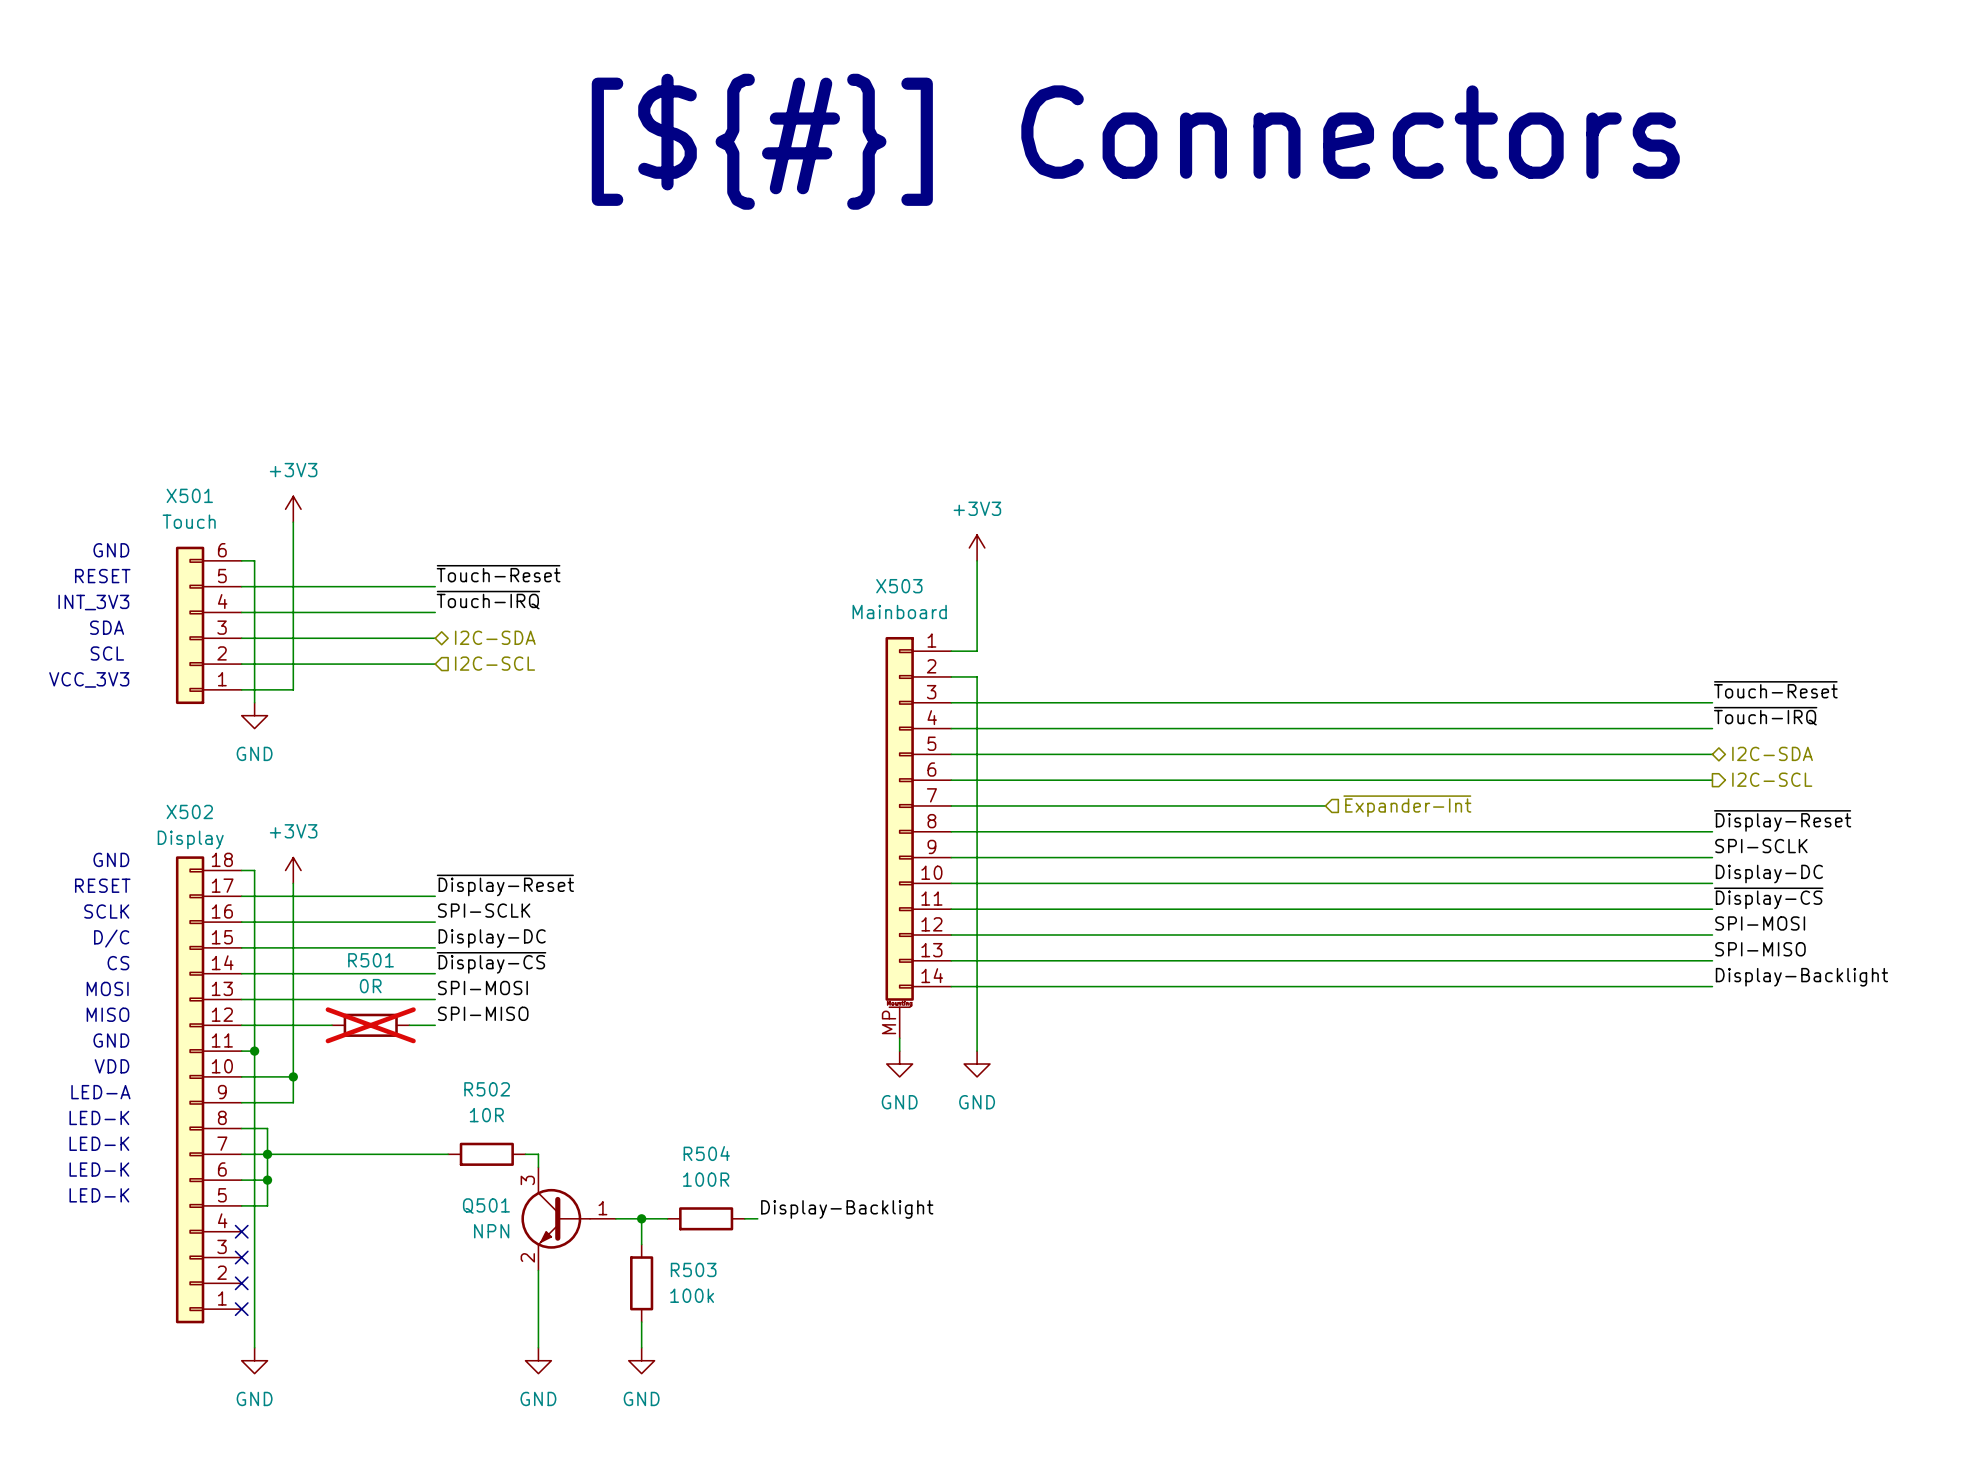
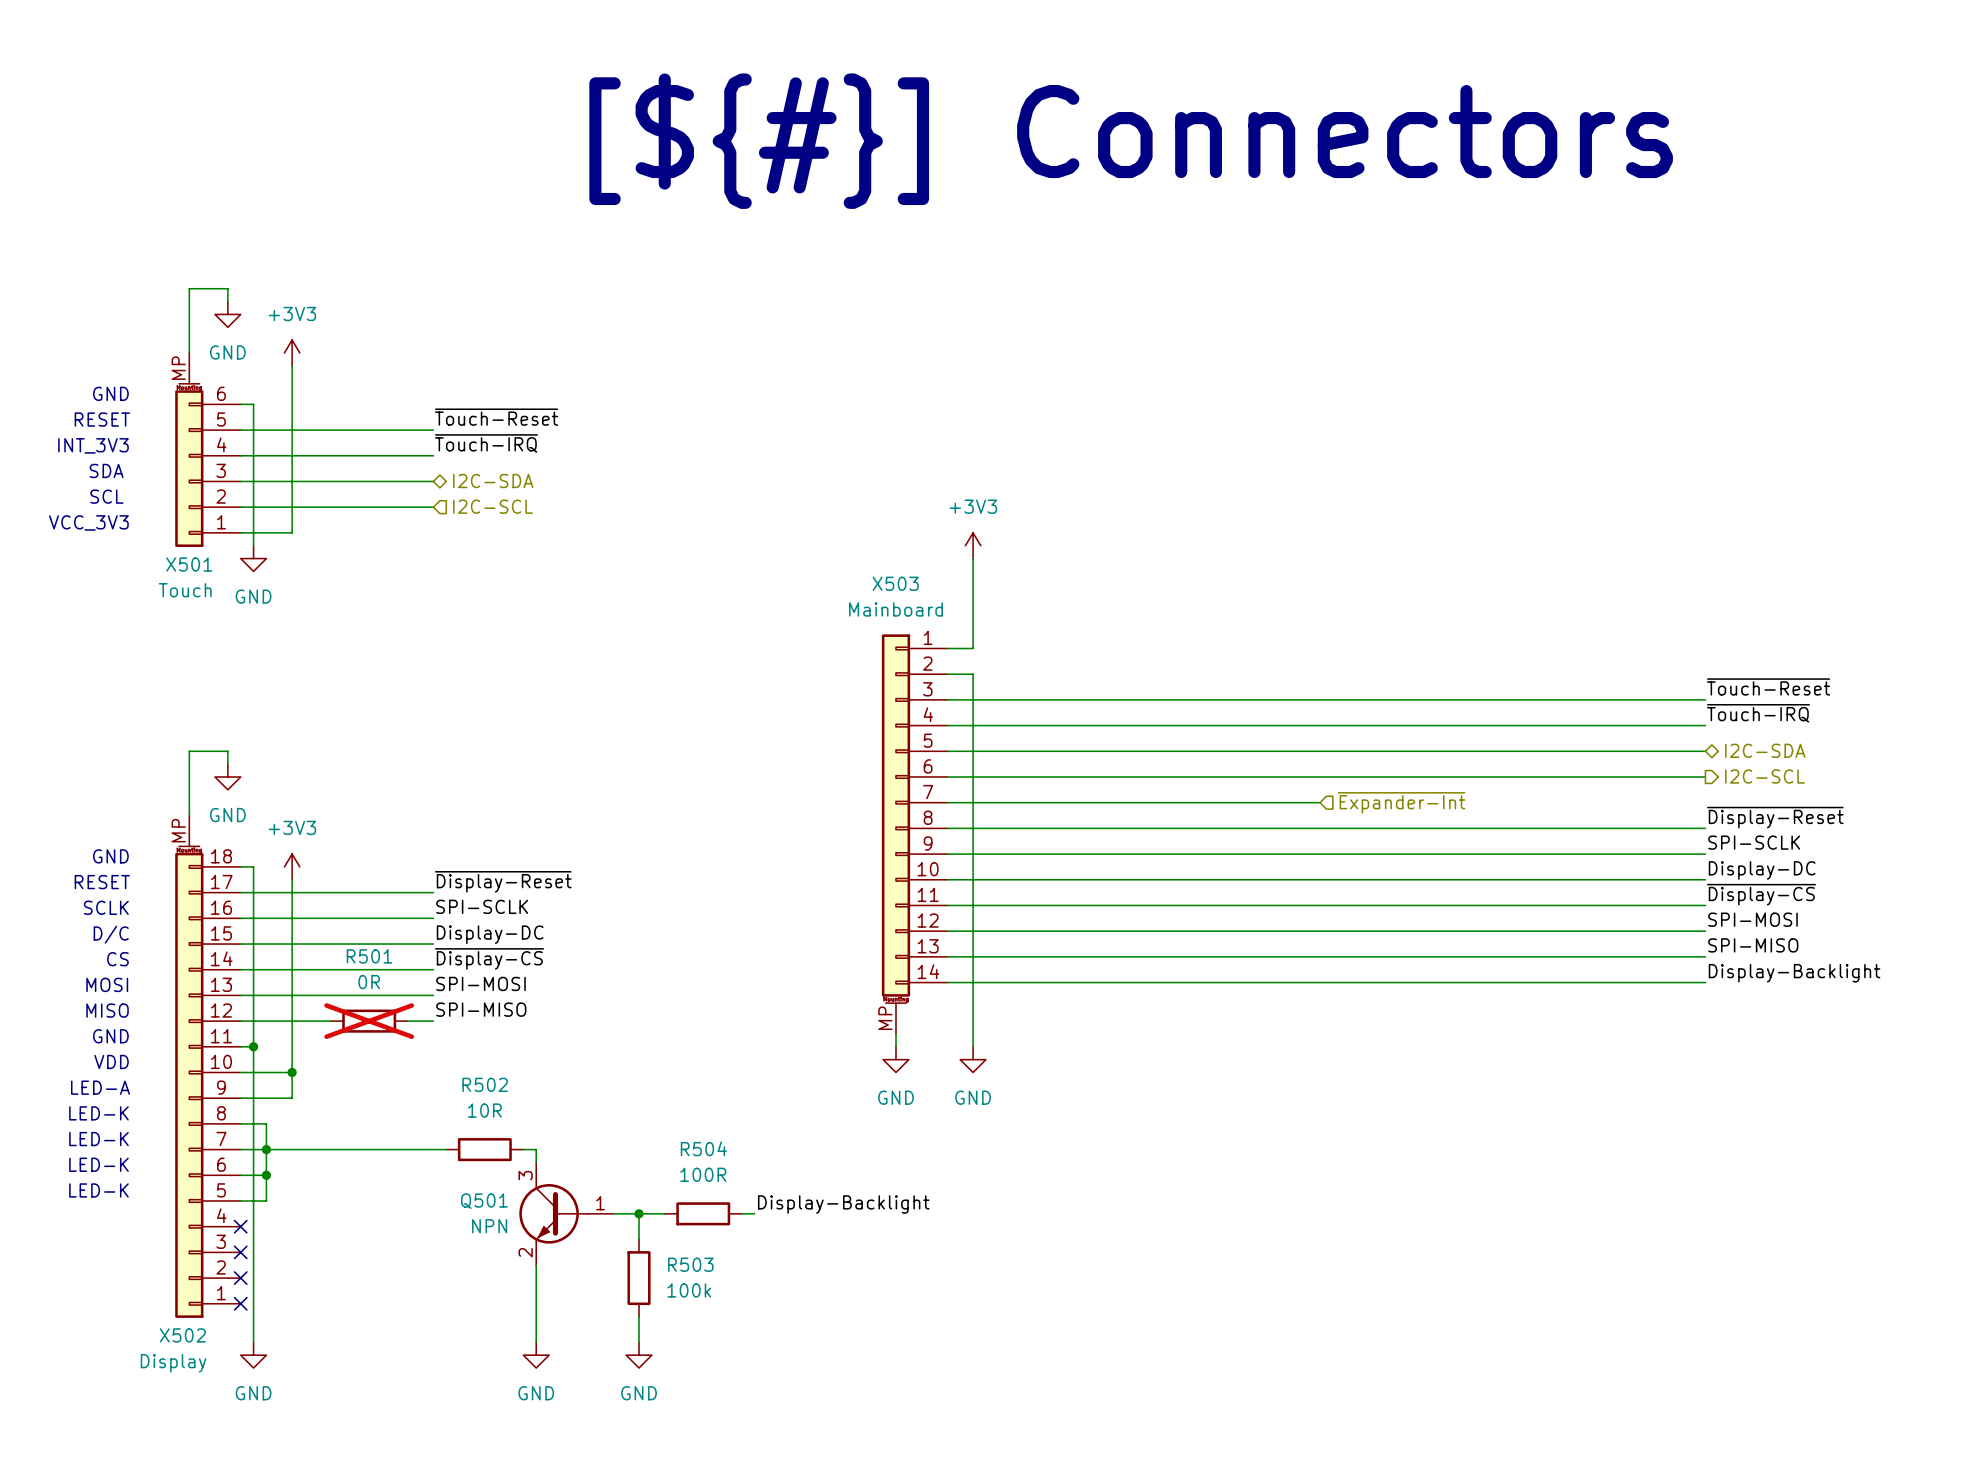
wire: none -> (227, 301) (227, 288) (189, 288) (189, 352)
power symbol: none -> GND (227, 314)
wire: none -> (292, 365) (292, 520)
X501 name position: X501 (189, 495) -> X501 (189, 564)
power symbol position: +3V3 (293, 509) -> +3V3 (292, 352)
X501 value position: Touch (189, 521) -> Touch (185, 590)
wire: (293, 535) (293, 689) (241, 689) -> (292, 532) (240, 532)
X501 symbol: [175, 546, 242, 705] -> [175, 352, 241, 548]
text position: GND (111, 550) -> GND (110, 393)
wire: (241, 560) (254, 560) (254, 702) -> (240, 404) (253, 404) (253, 545)
power symbol: none -> GND (253, 558)
label position: ~{Touch-Reset} (498, 573) -> ~{Touch-Reset} (496, 417)
text position: RESET (102, 576) -> RESET (102, 419)
wire: (241, 586) (435, 586) -> (240, 430) (433, 430)
label position: ~{Touch-IRQ} (488, 600) -> ~{Touch-IRQ} (486, 443)
text position: INT_3V3 (93, 602) -> INT_3V3 (93, 445)
wire: (241, 612) (435, 612) -> (240, 455) (433, 455)
text position: SDA (107, 627) -> SDA (106, 470)
hierarchical label position: I2C-SDA (495, 637) -> I2C-SDA (493, 480)
wire: (241, 638) (435, 638) -> (240, 481) (433, 481)
text position: SCL (107, 653) -> SCL (106, 496)
hierarchical label position: I2C-SCL (495, 663) -> I2C-SCL (492, 506)
wire: (241, 664) (435, 664) -> (240, 507) (433, 507)
text position: VCC_3V3 (89, 679) -> VCC_3V3 (88, 522)
power symbol position: GND (254, 715) -> GND (227, 776)
wire: none -> (227, 764) (227, 751) (189, 751) (189, 815)
X502 name position: X502 (189, 811) -> X502 (182, 1335)
X502 value position: Display (190, 839) -> Display (173, 1363)
X502 symbol: [175, 856, 242, 1324] -> [175, 815, 241, 1318]

